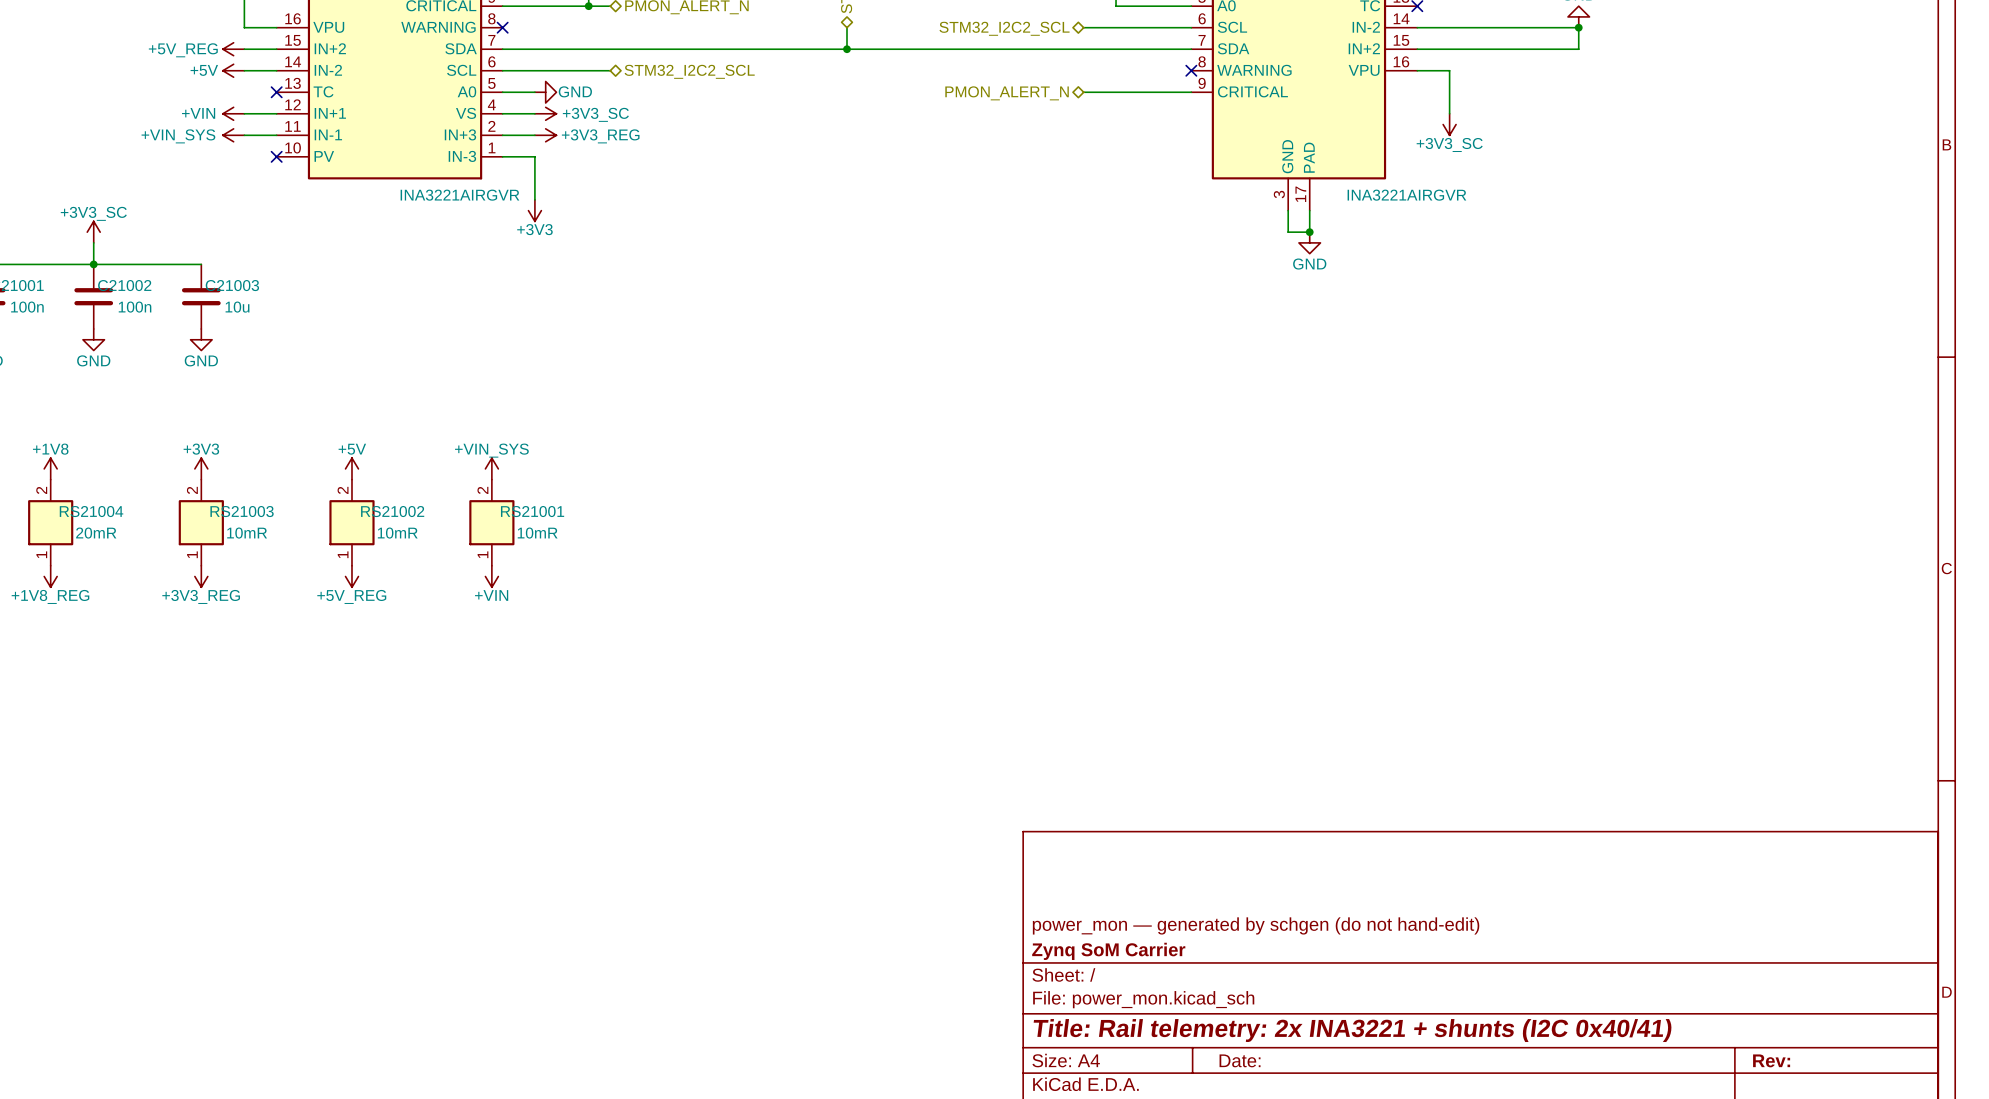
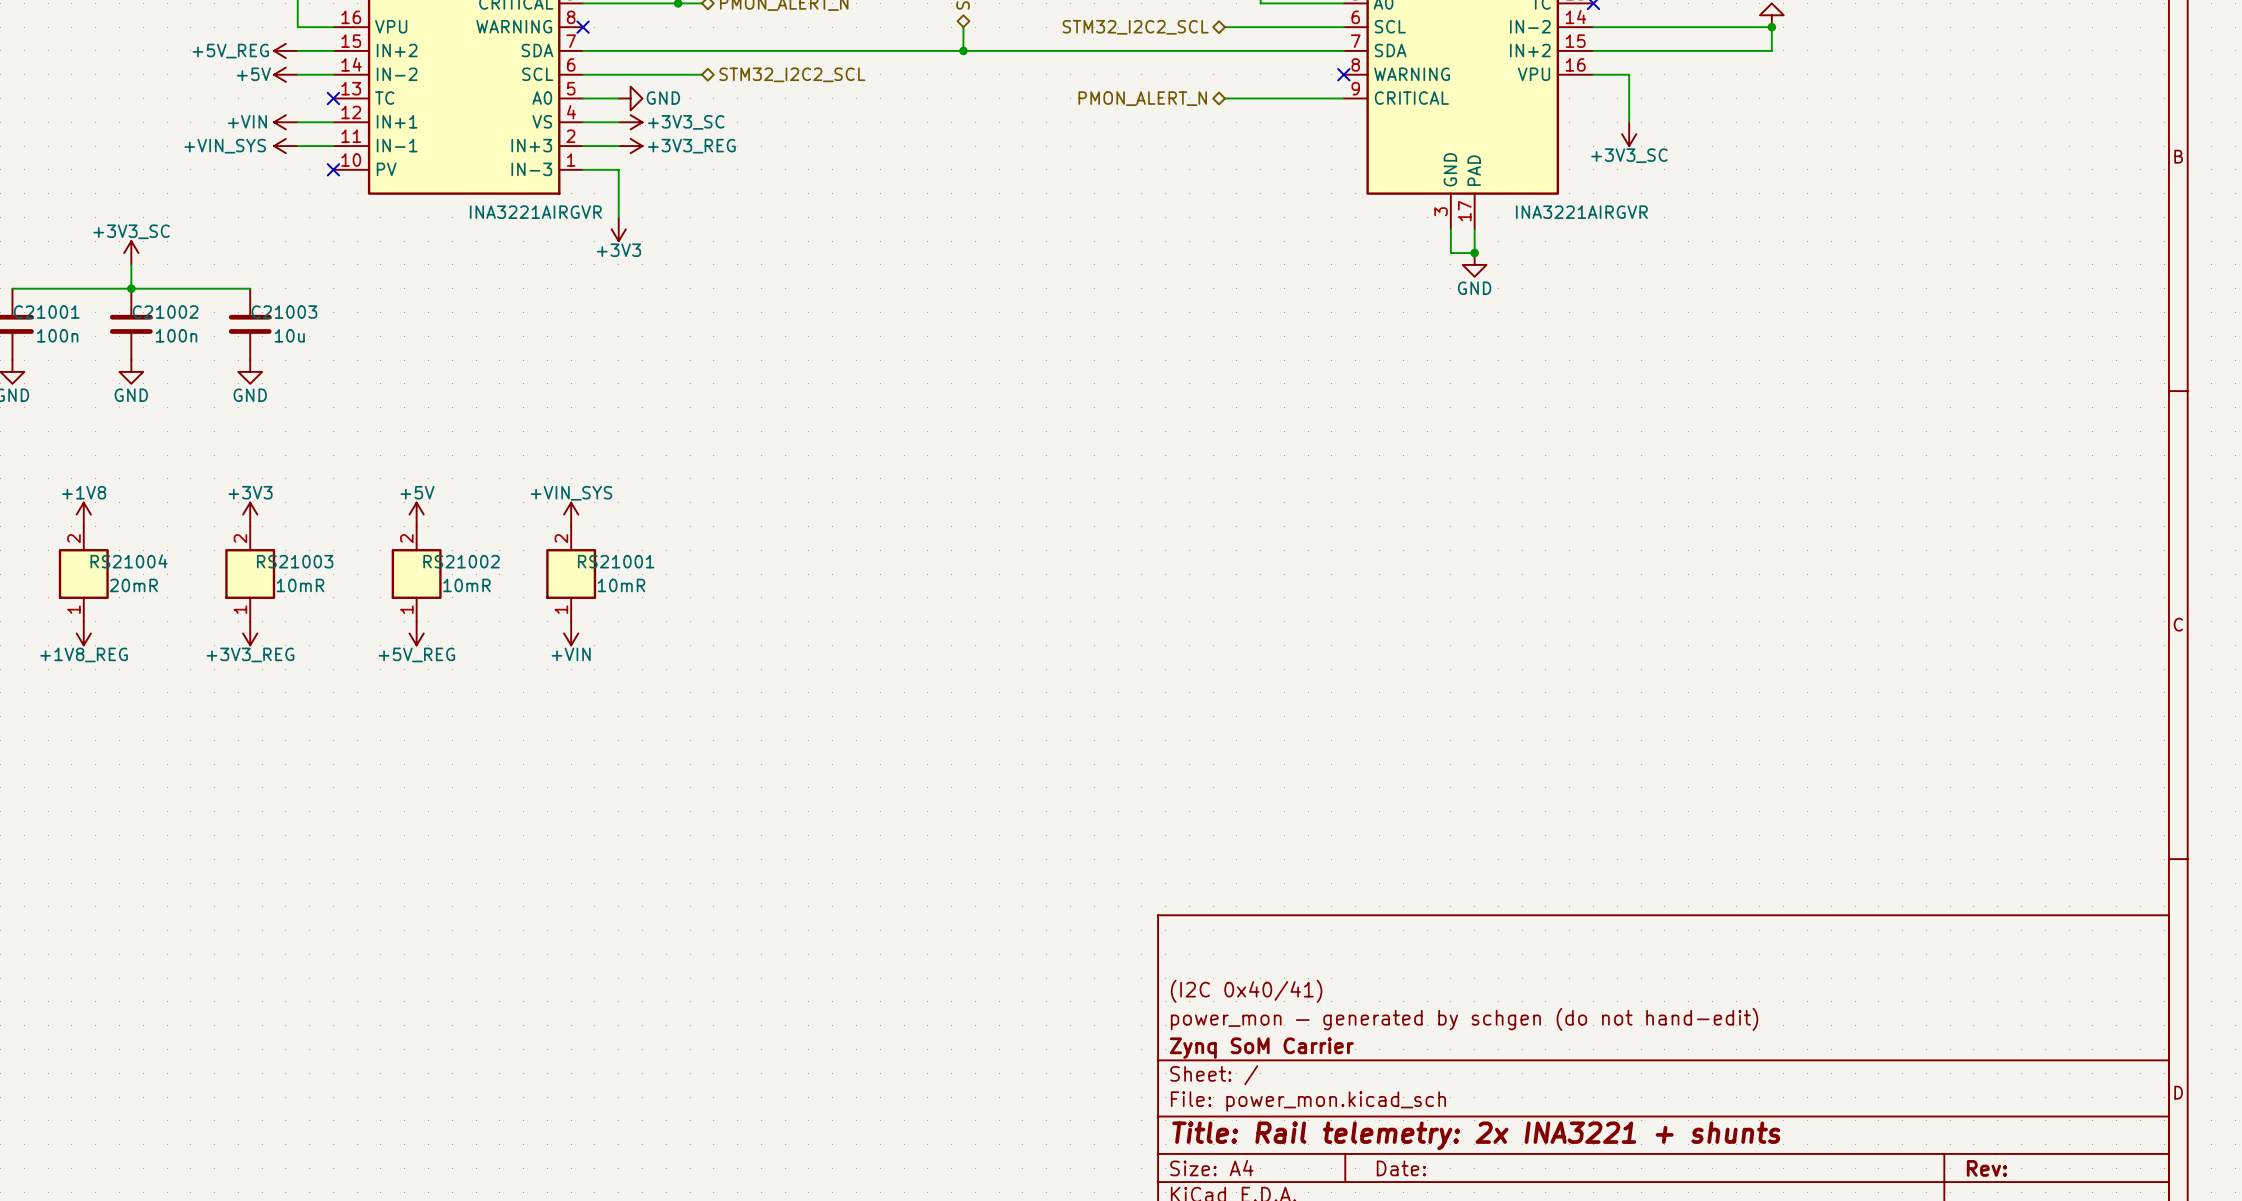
title block: none -> (I2C 0x40/41) (1246, 991)
title block: Title: Rail telemetry: 2x INA3221 + shunts (I2C 0x40/41) (1352, 1030) -> Title: Rail telemetry: 2x INA3221 + shunts (1476, 1135)

